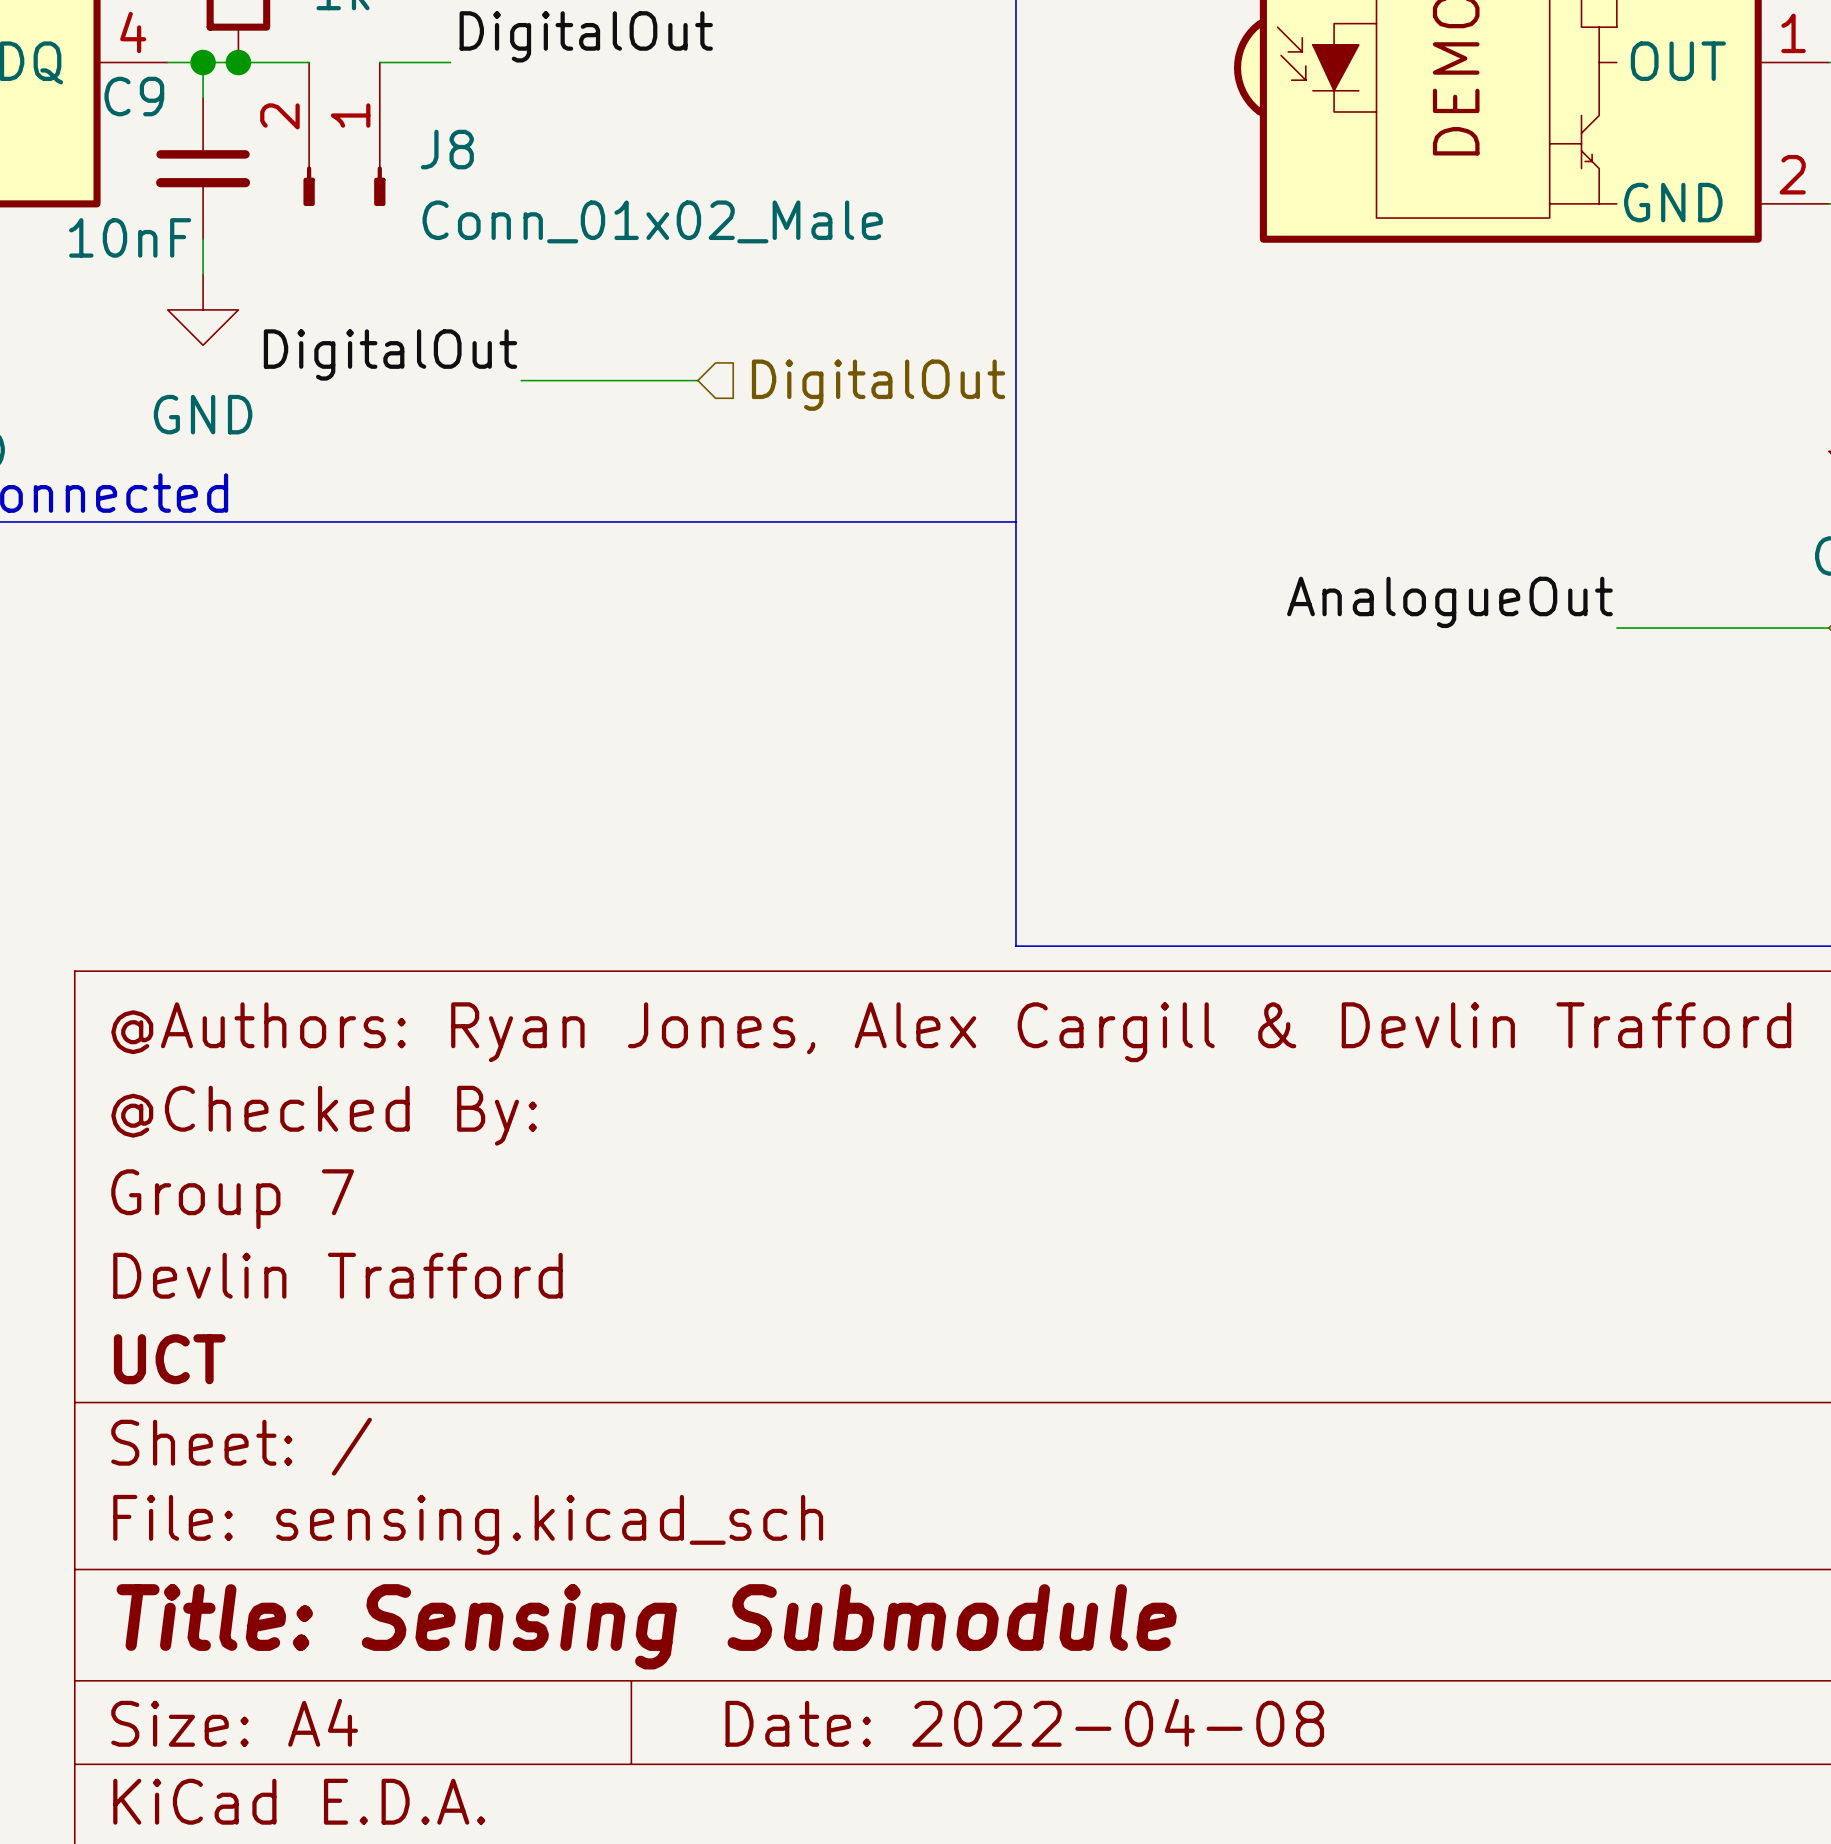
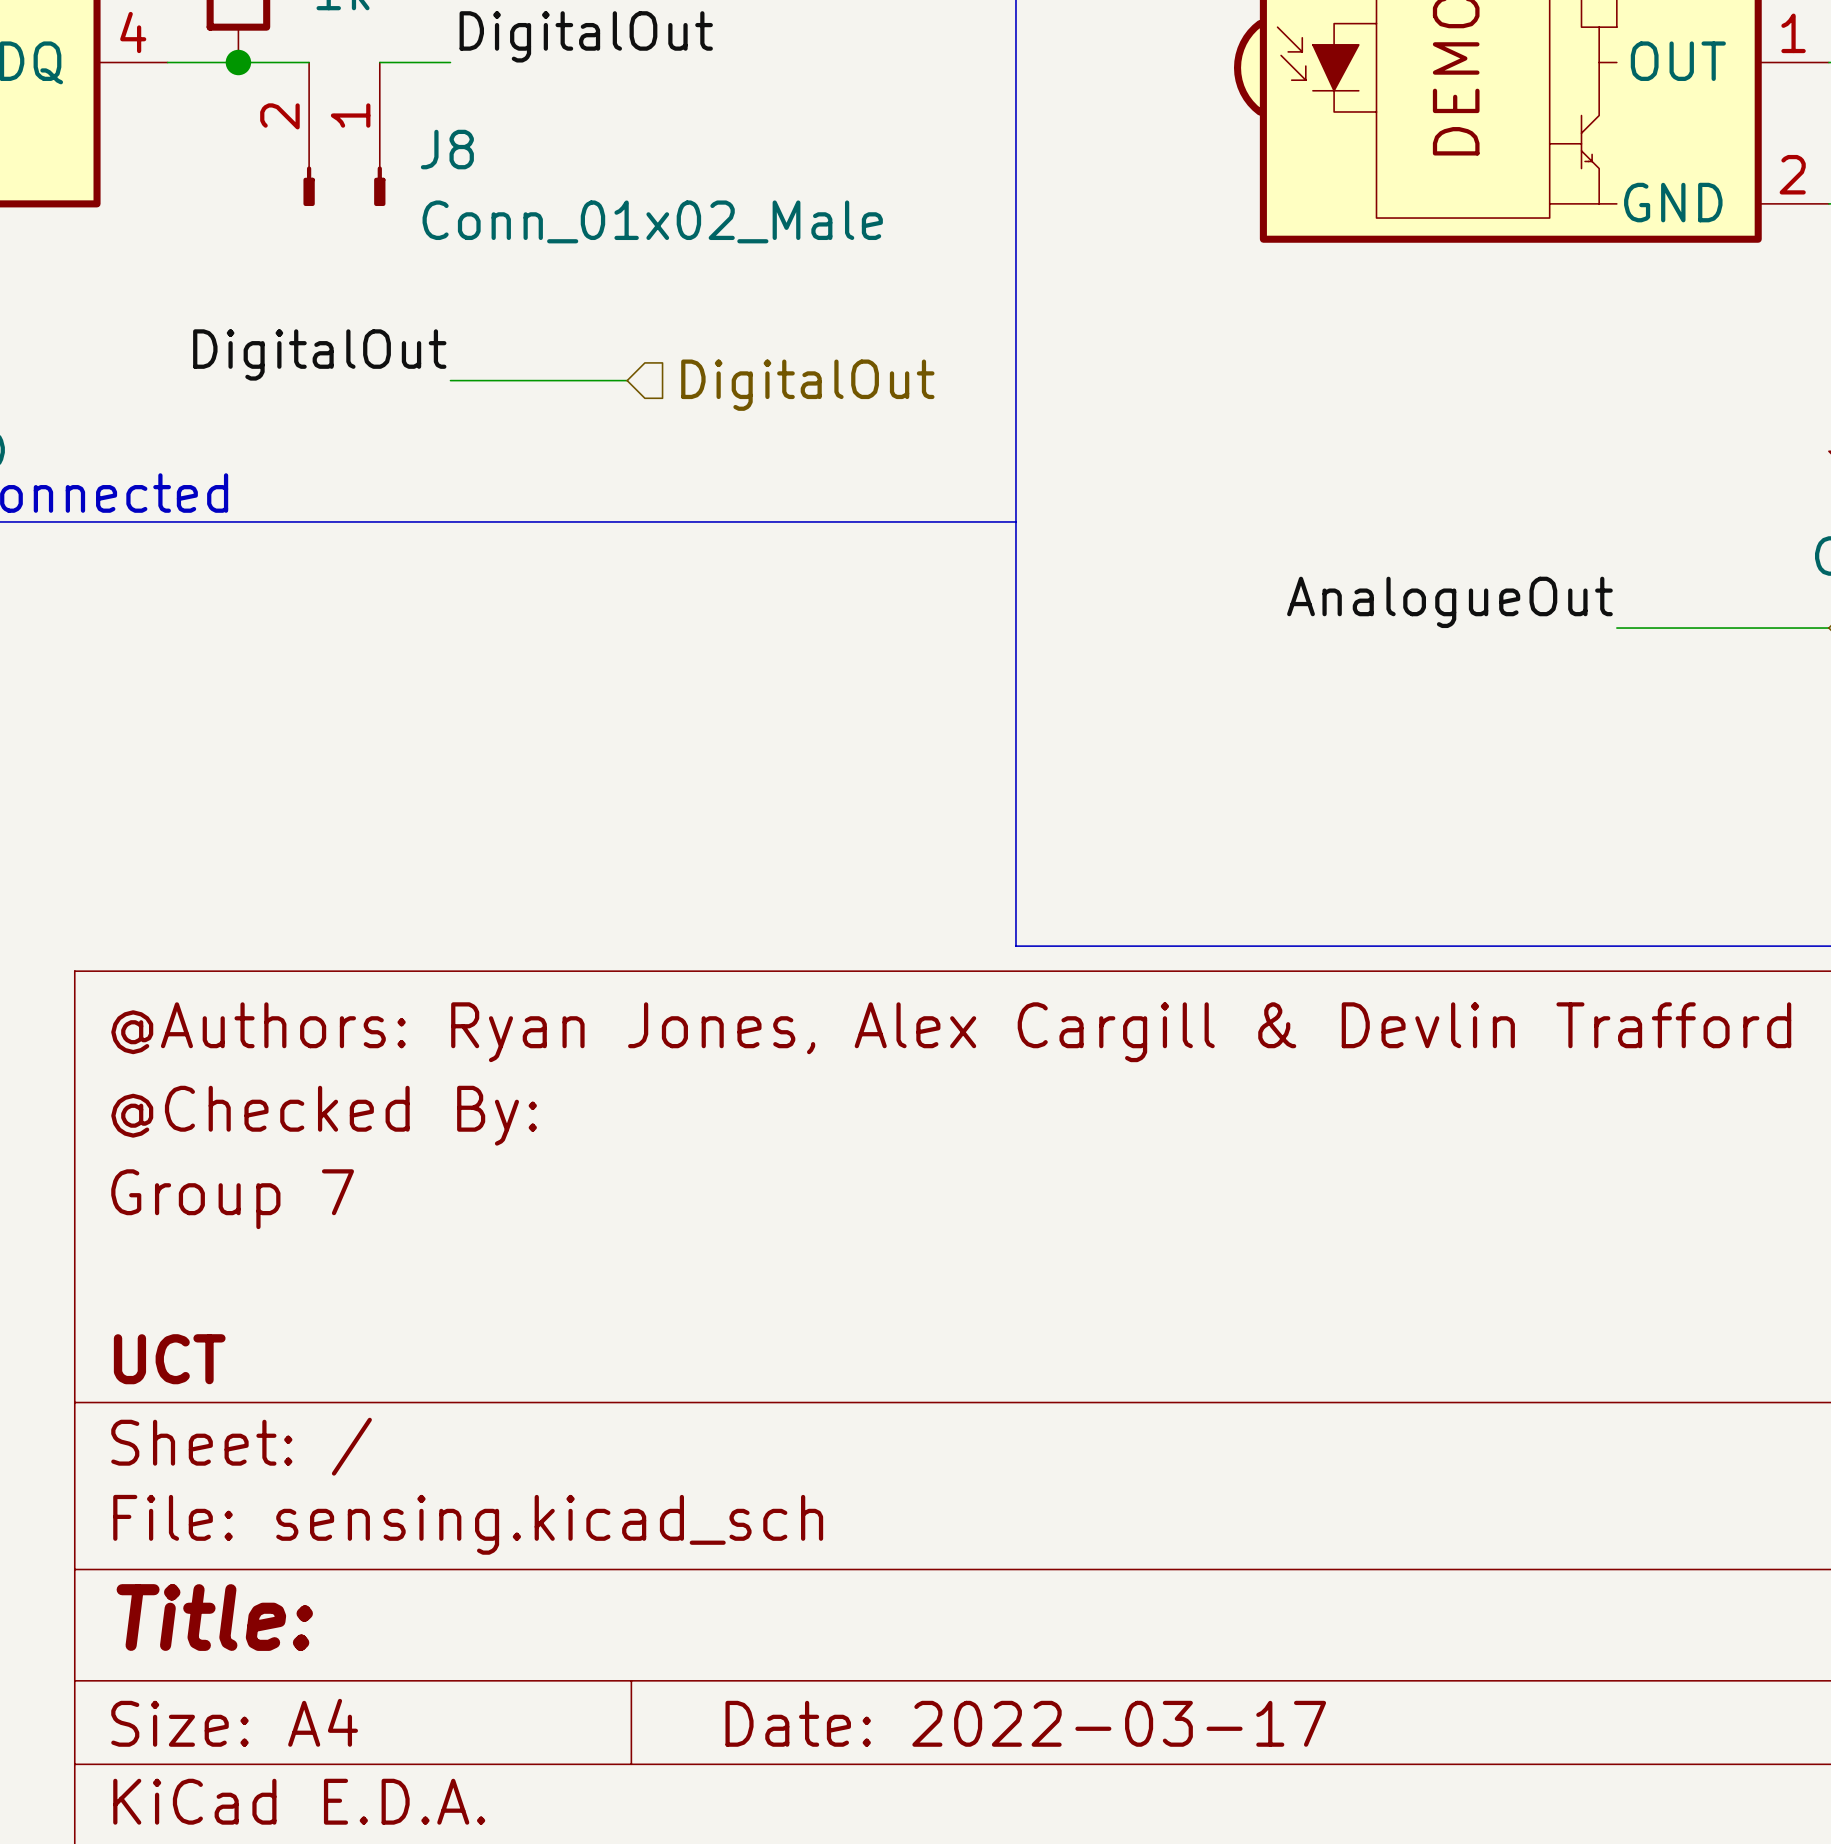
wire: (203, 62) (203, 97) -> none
junction: (203, 62) -> none
C9: 10nF (203, 168) -> none
wire: (203, 239) (203, 274) -> none
power symbol: GND (203, 309) -> none
label position: DigitalOut (390, 354) -> DigitalOut (319, 354)
wire: (627, 380) (697, 380) -> (450, 380) (521, 380)
hierarchical label position: DigitalOut (878, 385) -> DigitalOut (807, 385)
title block: Devlin Trafford (337, 1275) -> none
title block: Title: Sensing Submodule (646, 1626) -> Title: (214, 1617)
title block: Date: 2022-04-08 (1024, 1722) -> Date: 2022-03-17 (1025, 1723)

